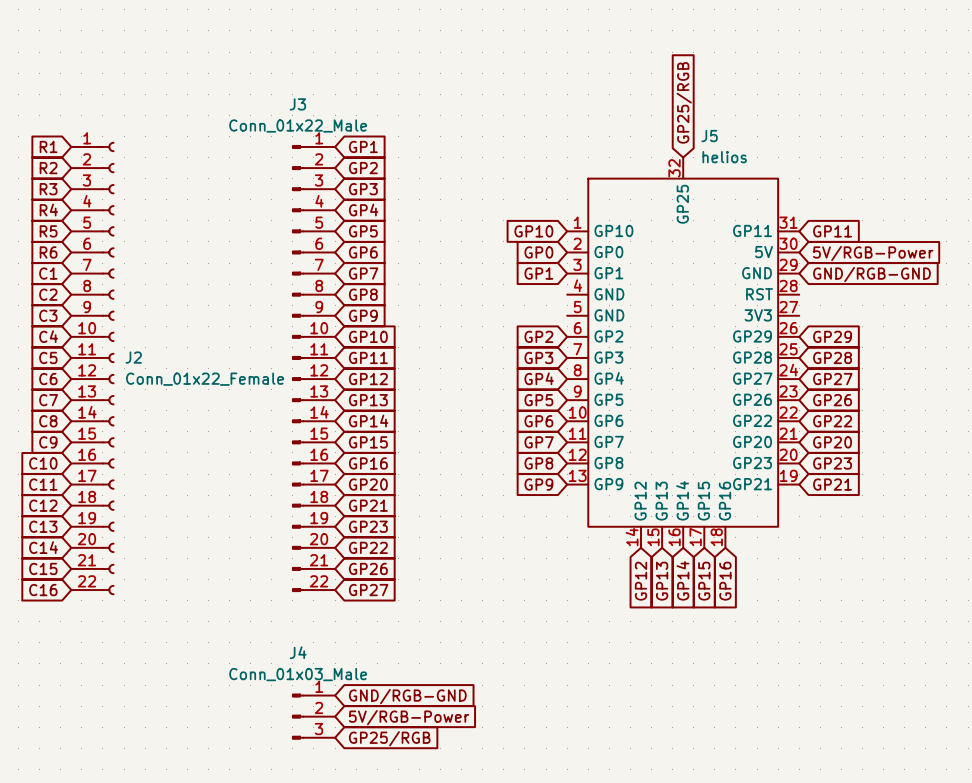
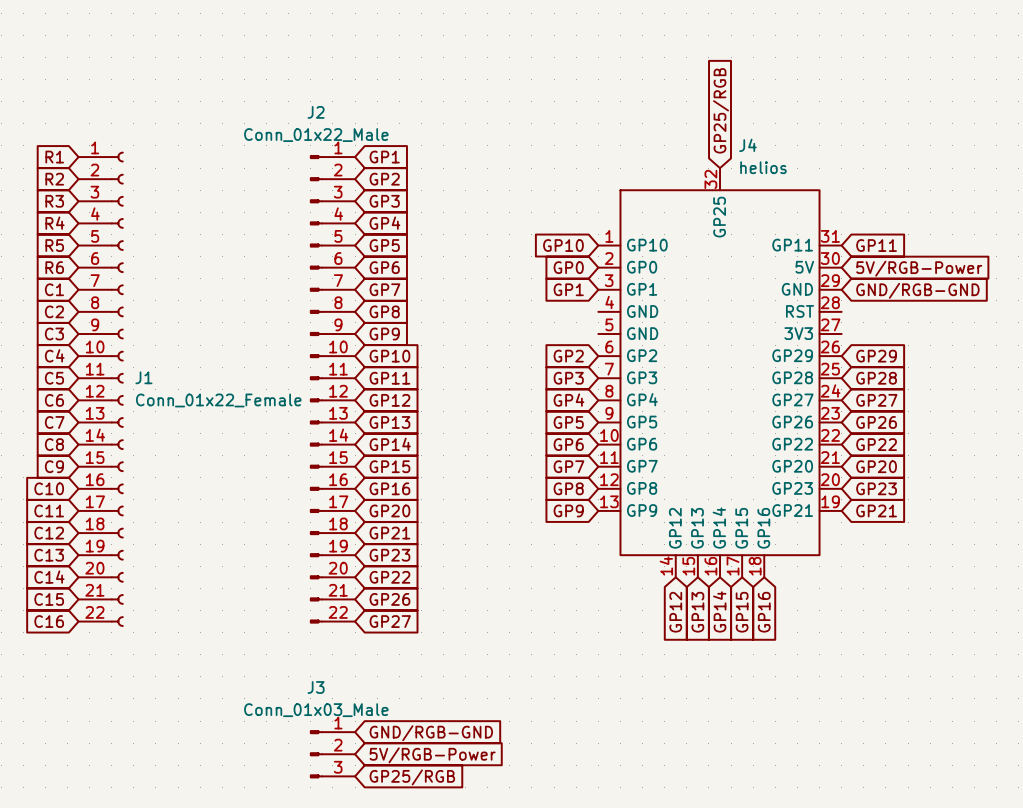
J3 name: J3 (297, 104) -> J2 (316, 112)
J5 name: J5 (709, 136) -> J4 (747, 145)
J2 name: J2 (133, 357) -> J1 (143, 377)
J4 name: J4 (298, 652) -> J3 (316, 687)

